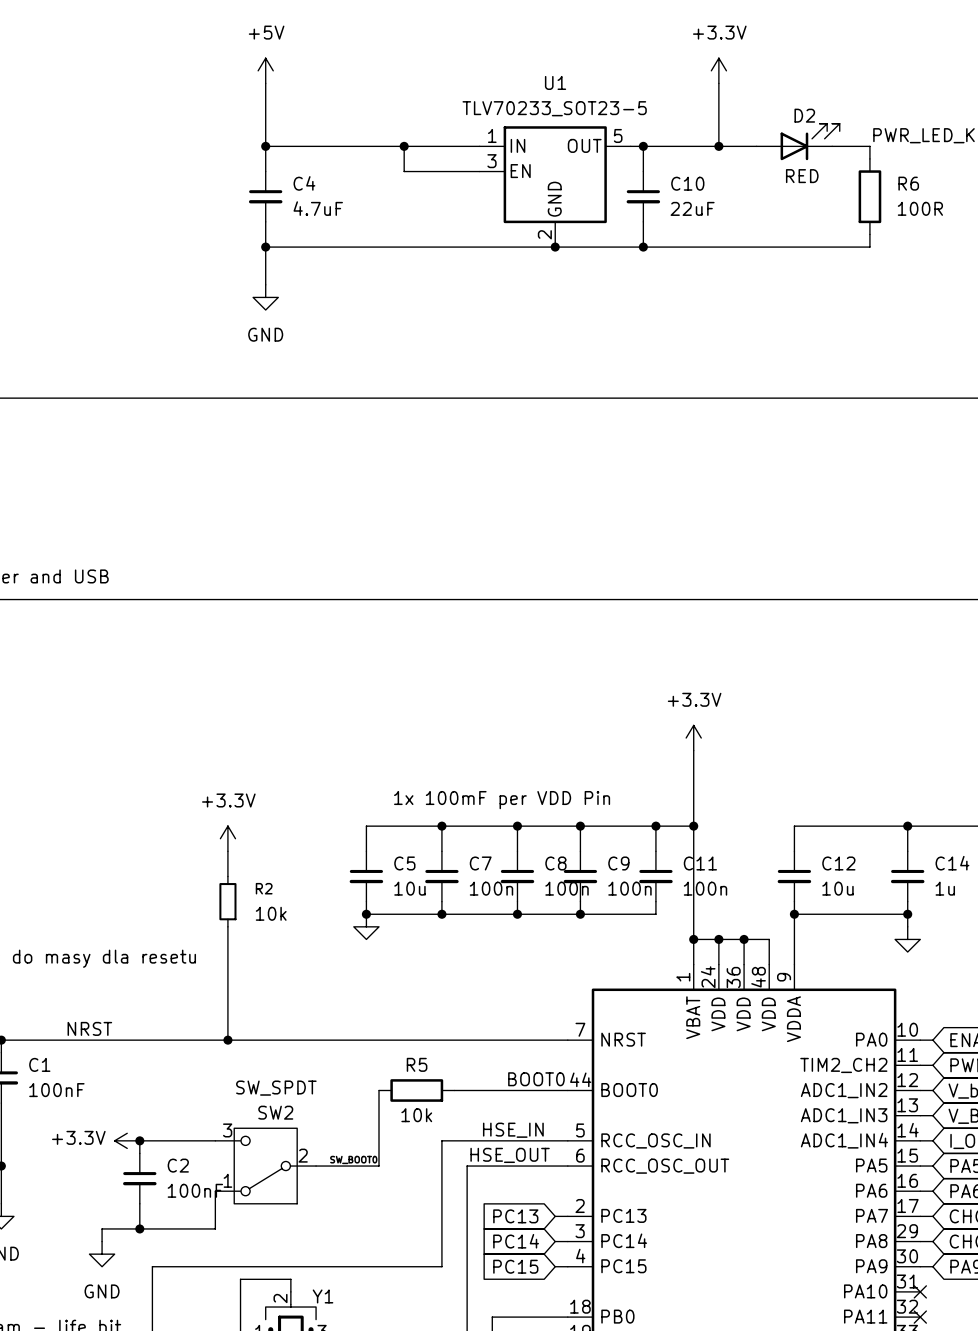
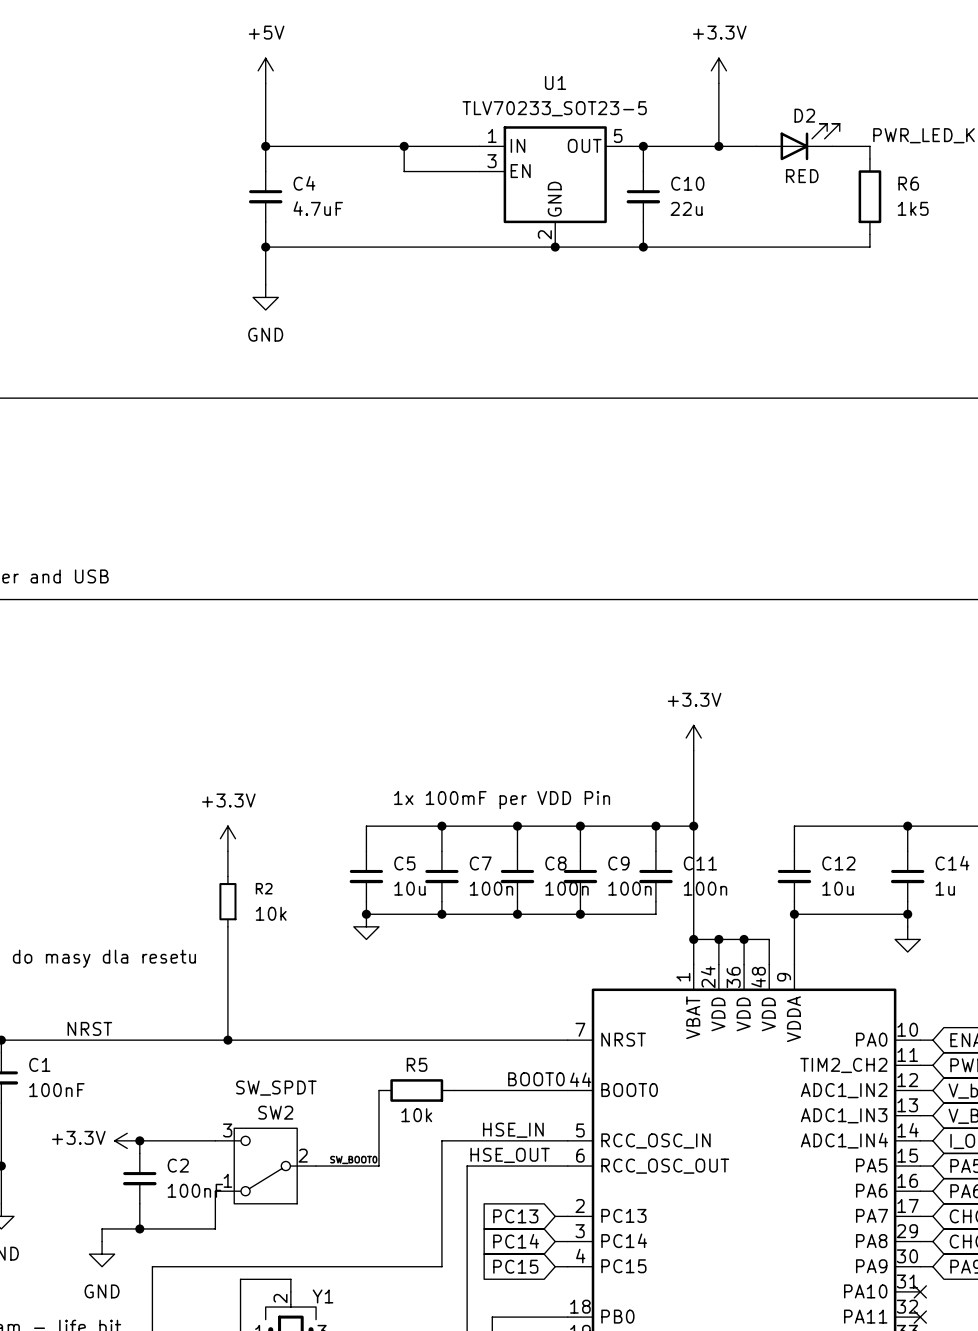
C10 value: 22uF (692, 208) -> 22u (686, 208)
R6 value: 100R (920, 208) -> 1k5 (913, 208)

